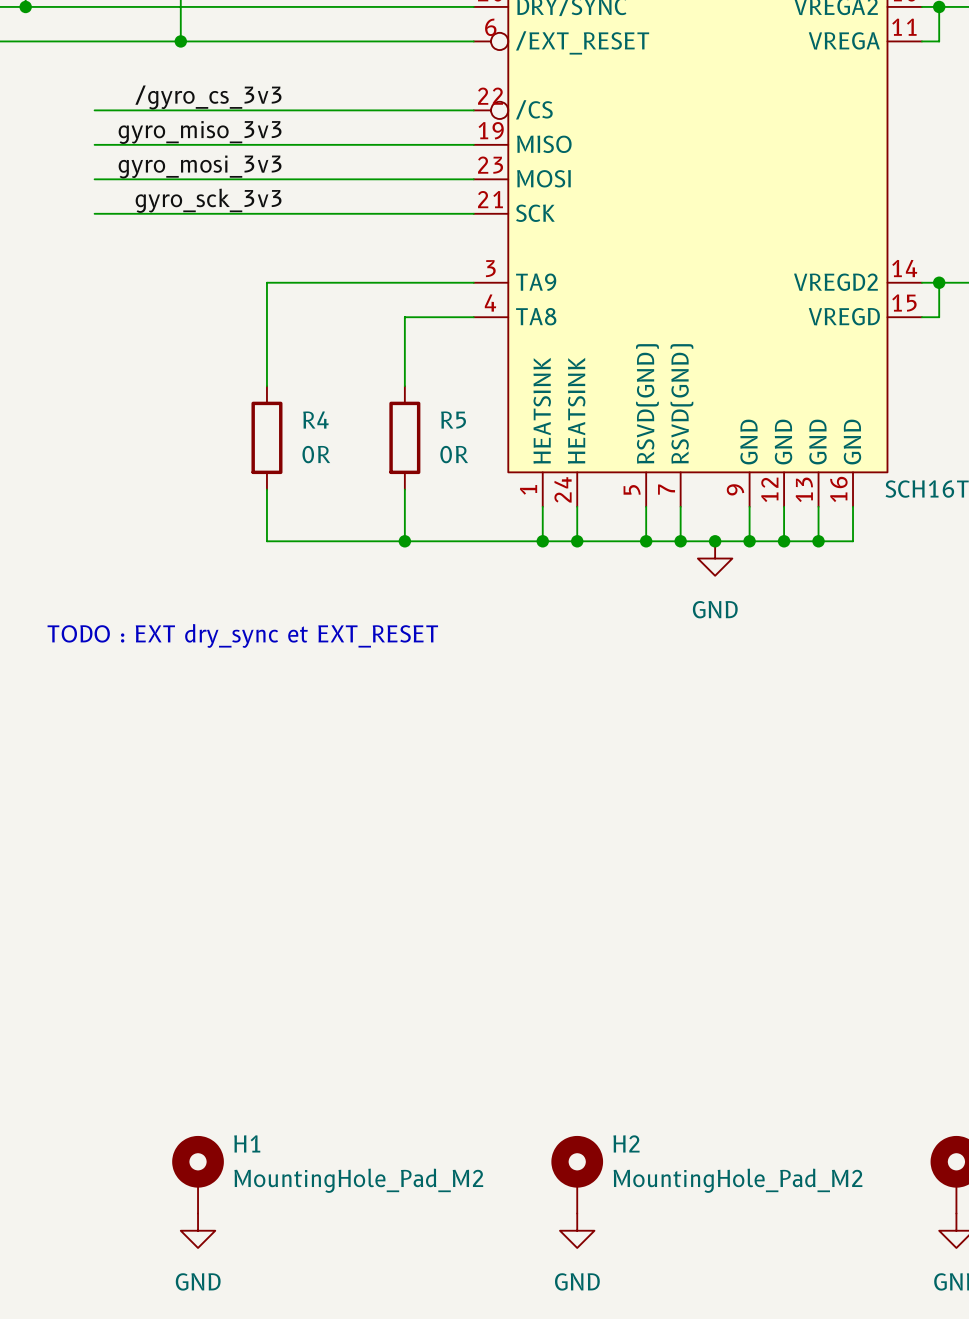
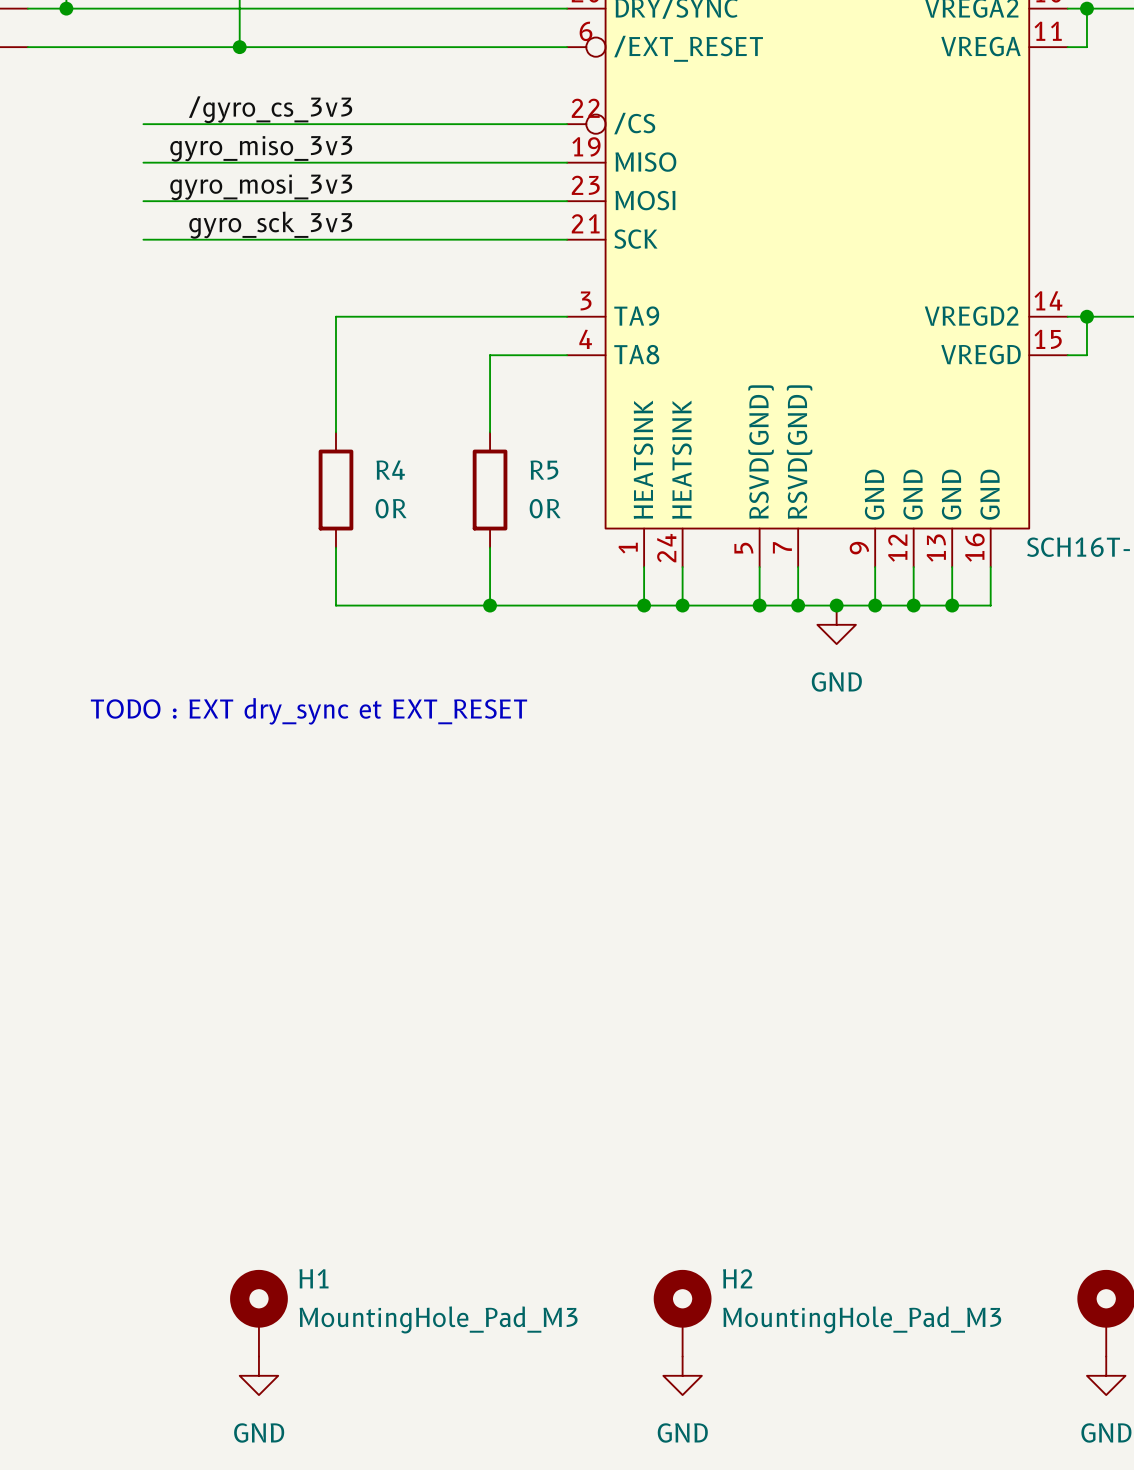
H1 value: MountingHole_Pad_M2 (358, 1180) -> MountingHole_Pad_M3 (438, 1319)
H2 value: MountingHole_Pad_M2 (738, 1180) -> MountingHole_Pad_M3 (862, 1319)

